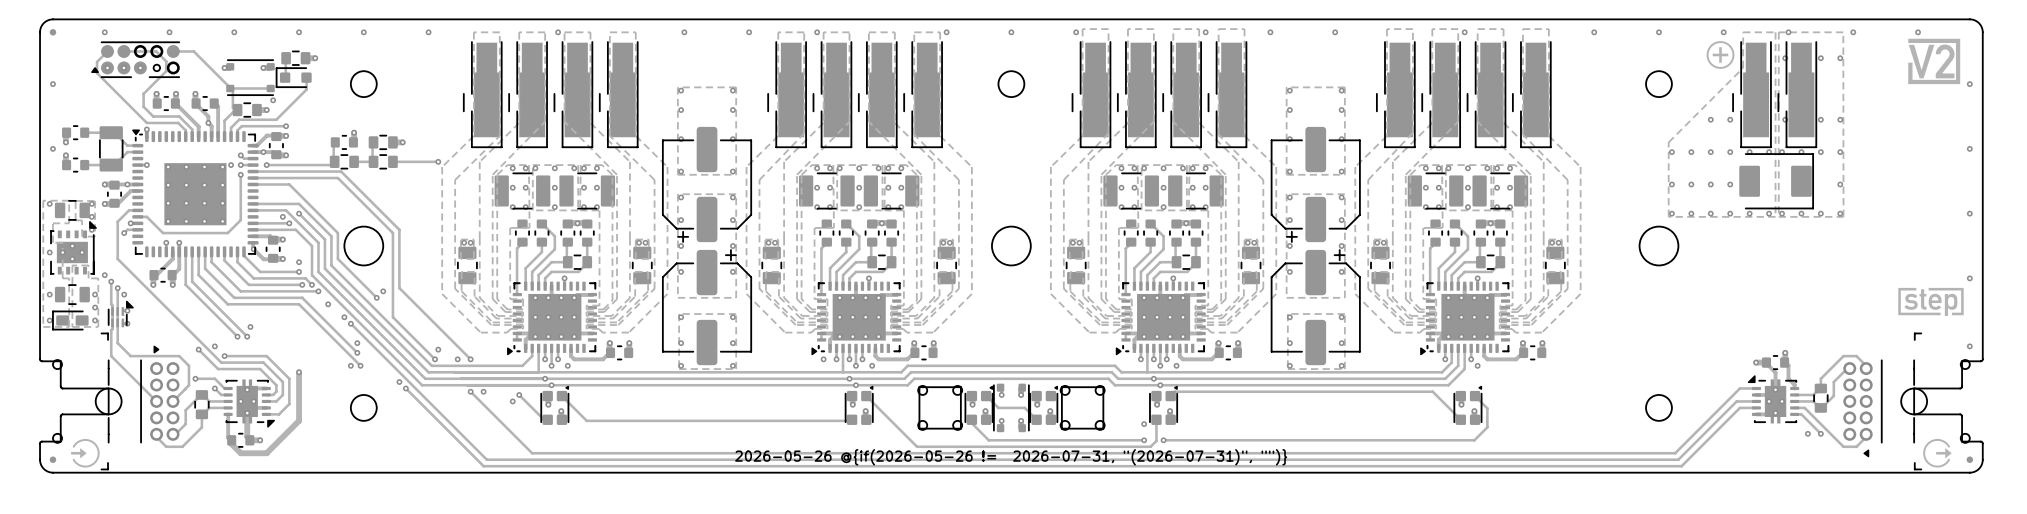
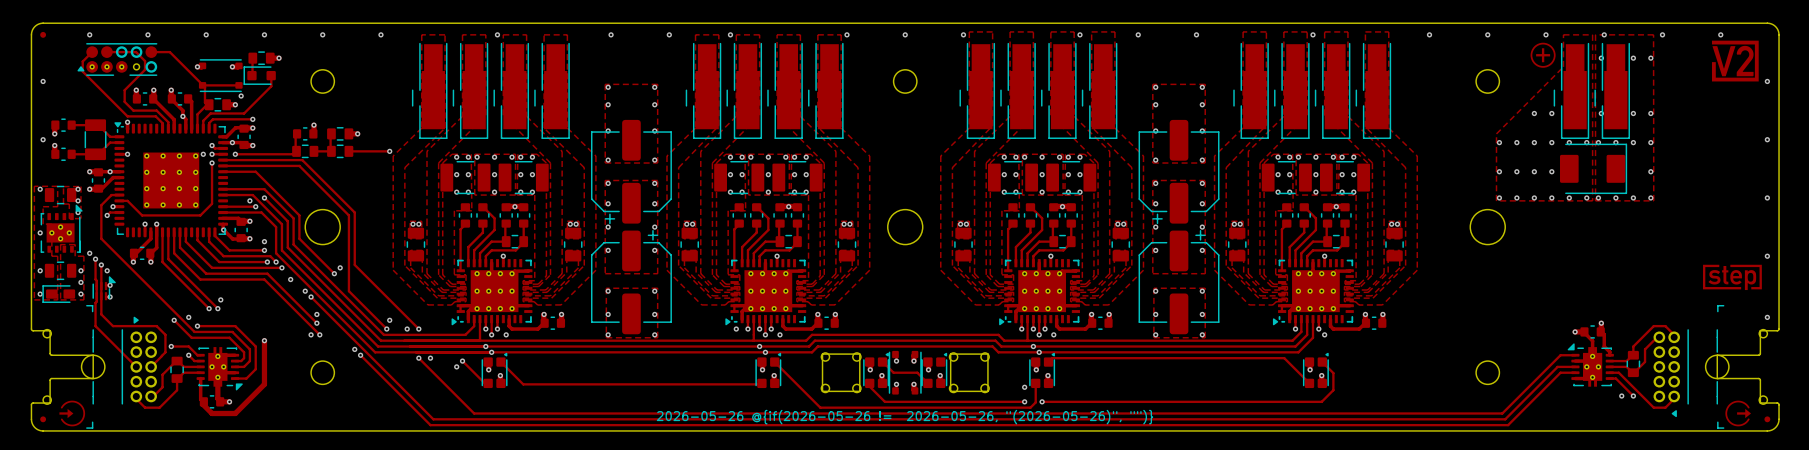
drawing shape: [735, 449, 1288, 466] -> [656, 409, 1154, 425]

